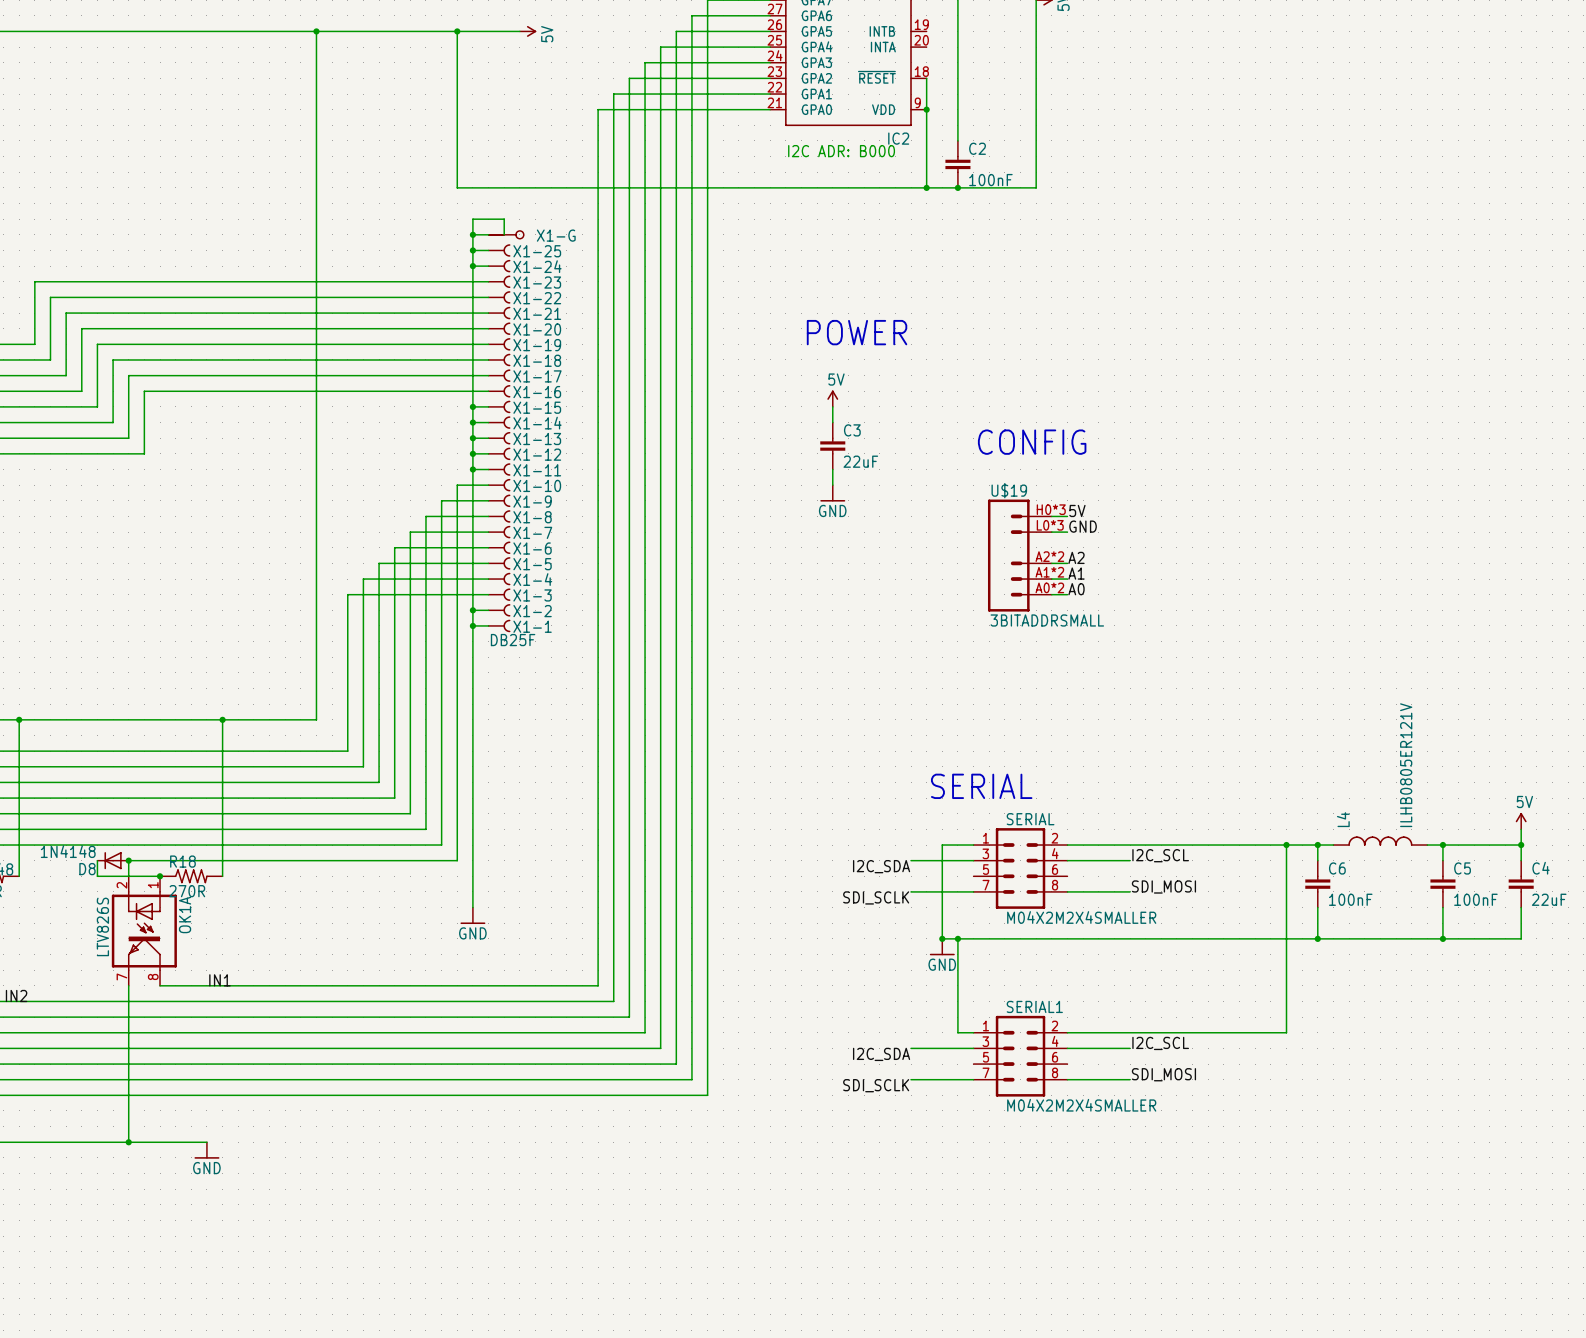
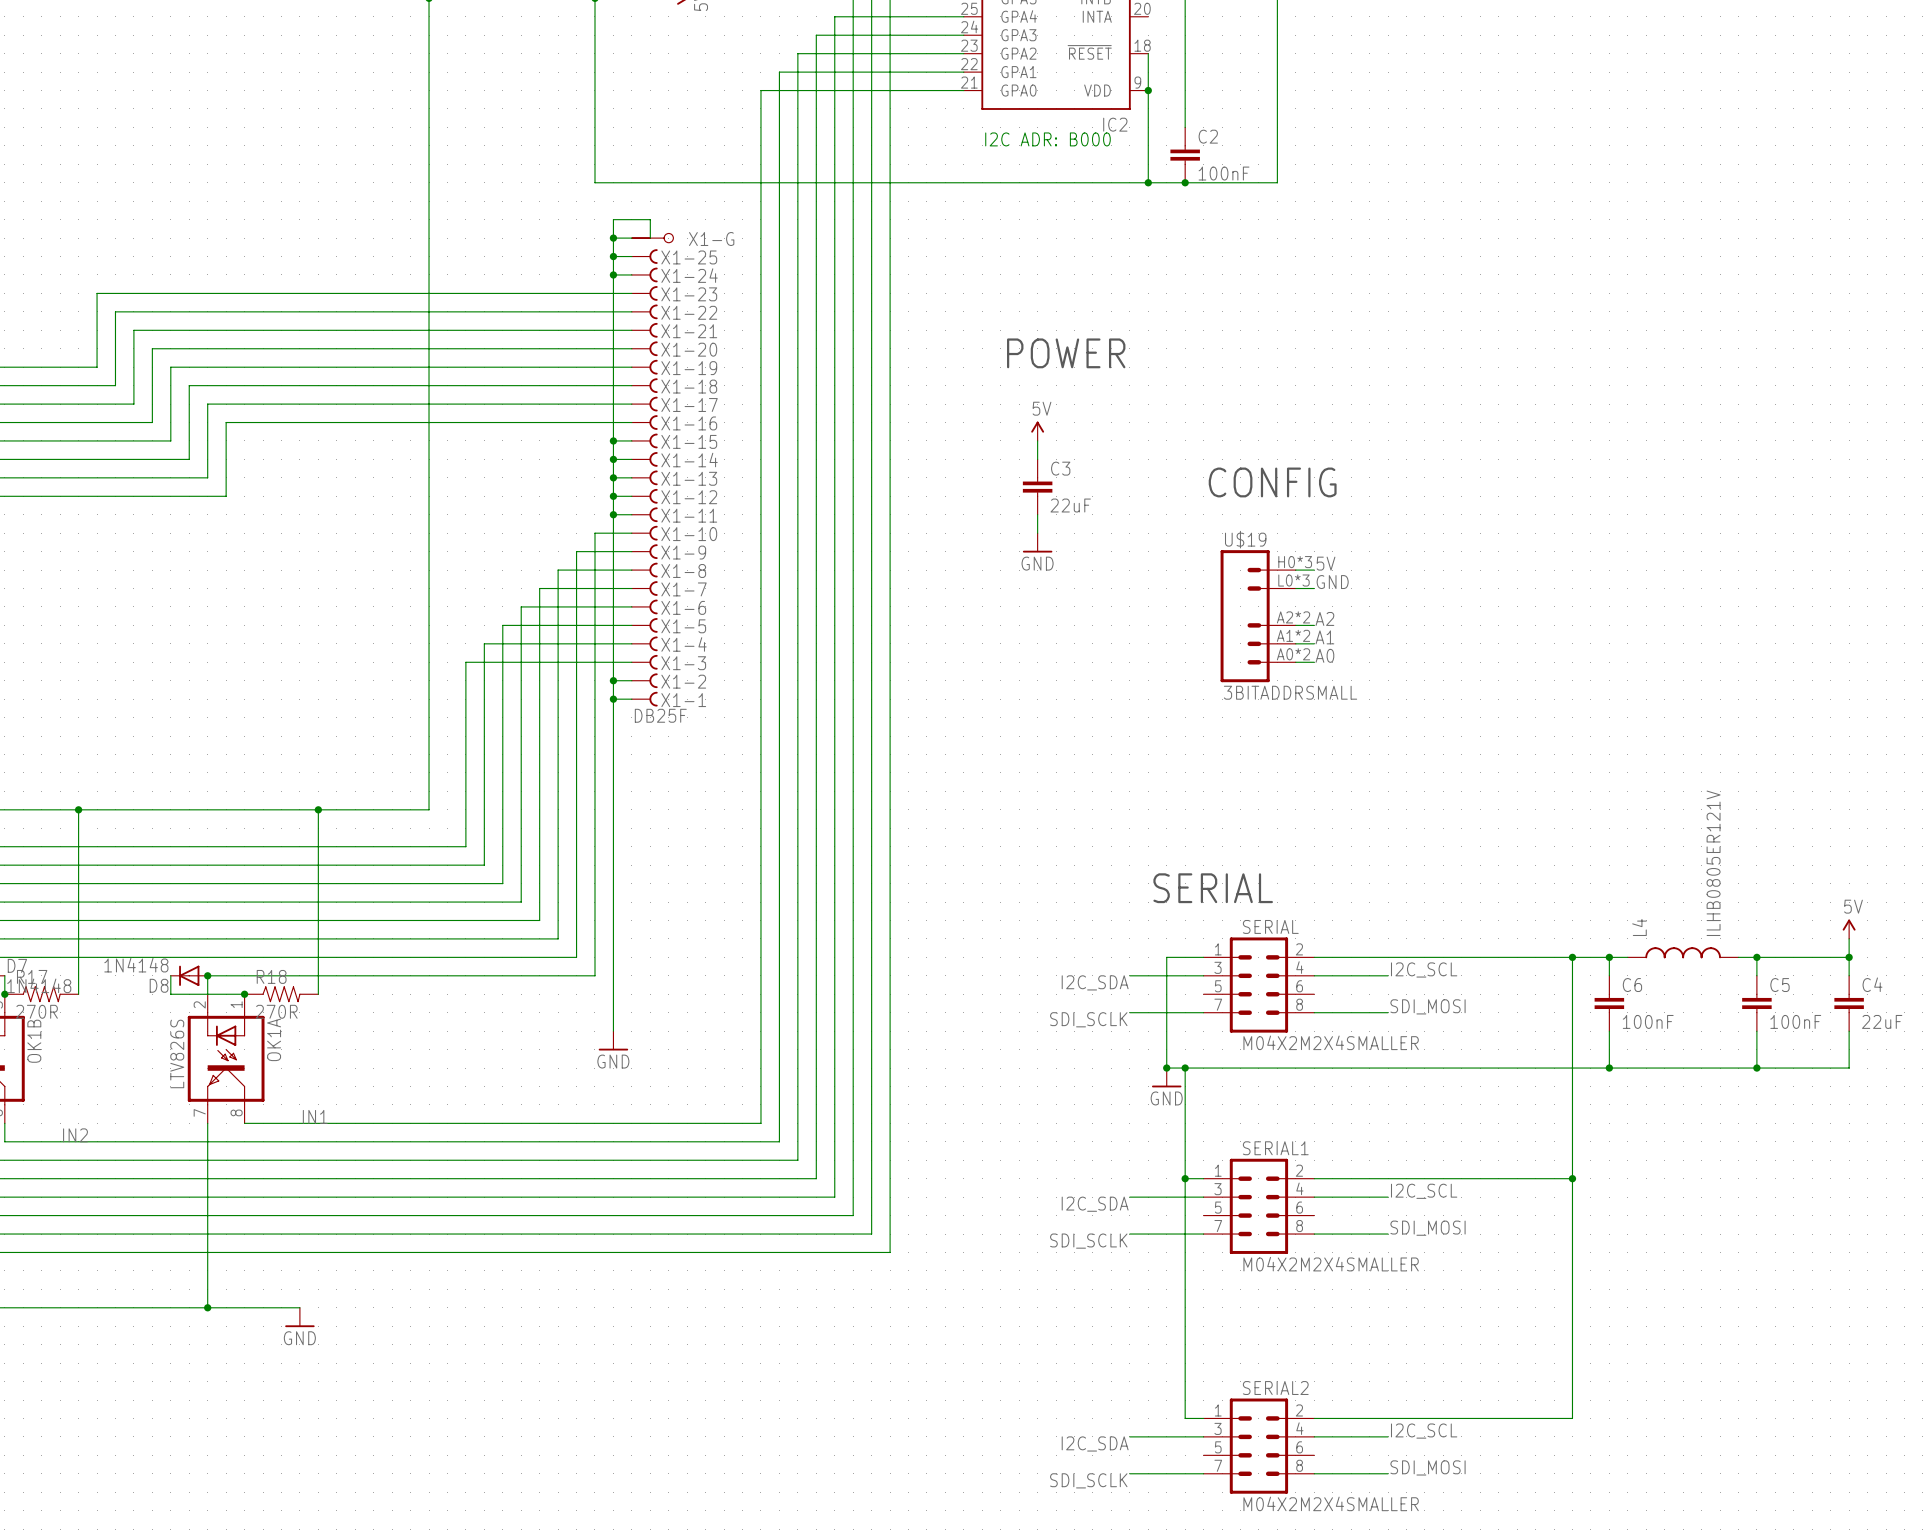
wire: none -> (1185, 1178) (1185, 1418) (1203, 1418)
junction: none -> (1185, 1178)
wire: none -> (1572, 1178) (1572, 1418) (1314, 1418)
junction: none -> (1572, 1178)
label: none -> I2C_SCL (1424, 1431)
wire: none -> (1129, 1436) (1203, 1436)
wire: none -> (1314, 1436) (1388, 1436)
label: none -> I2C_SDA (1095, 1443)
SERIAL2: none -> M04X2M2X4SMALLER (1258, 1446)
label: none -> SDI_MOSI (1428, 1467)
wire: none -> (1129, 1473) (1203, 1473)
wire: none -> (1314, 1473) (1388, 1473)
label: none -> SDI_SCLK (1088, 1480)

